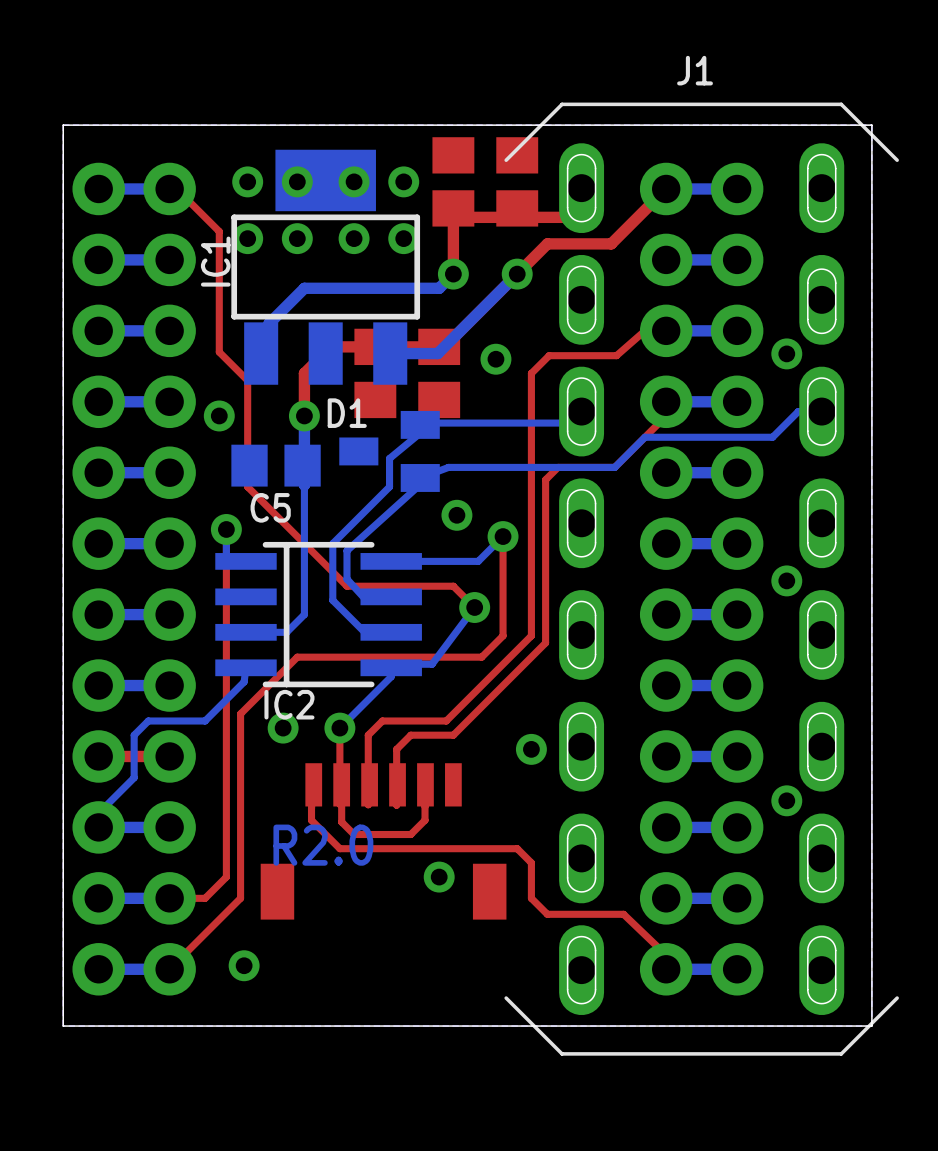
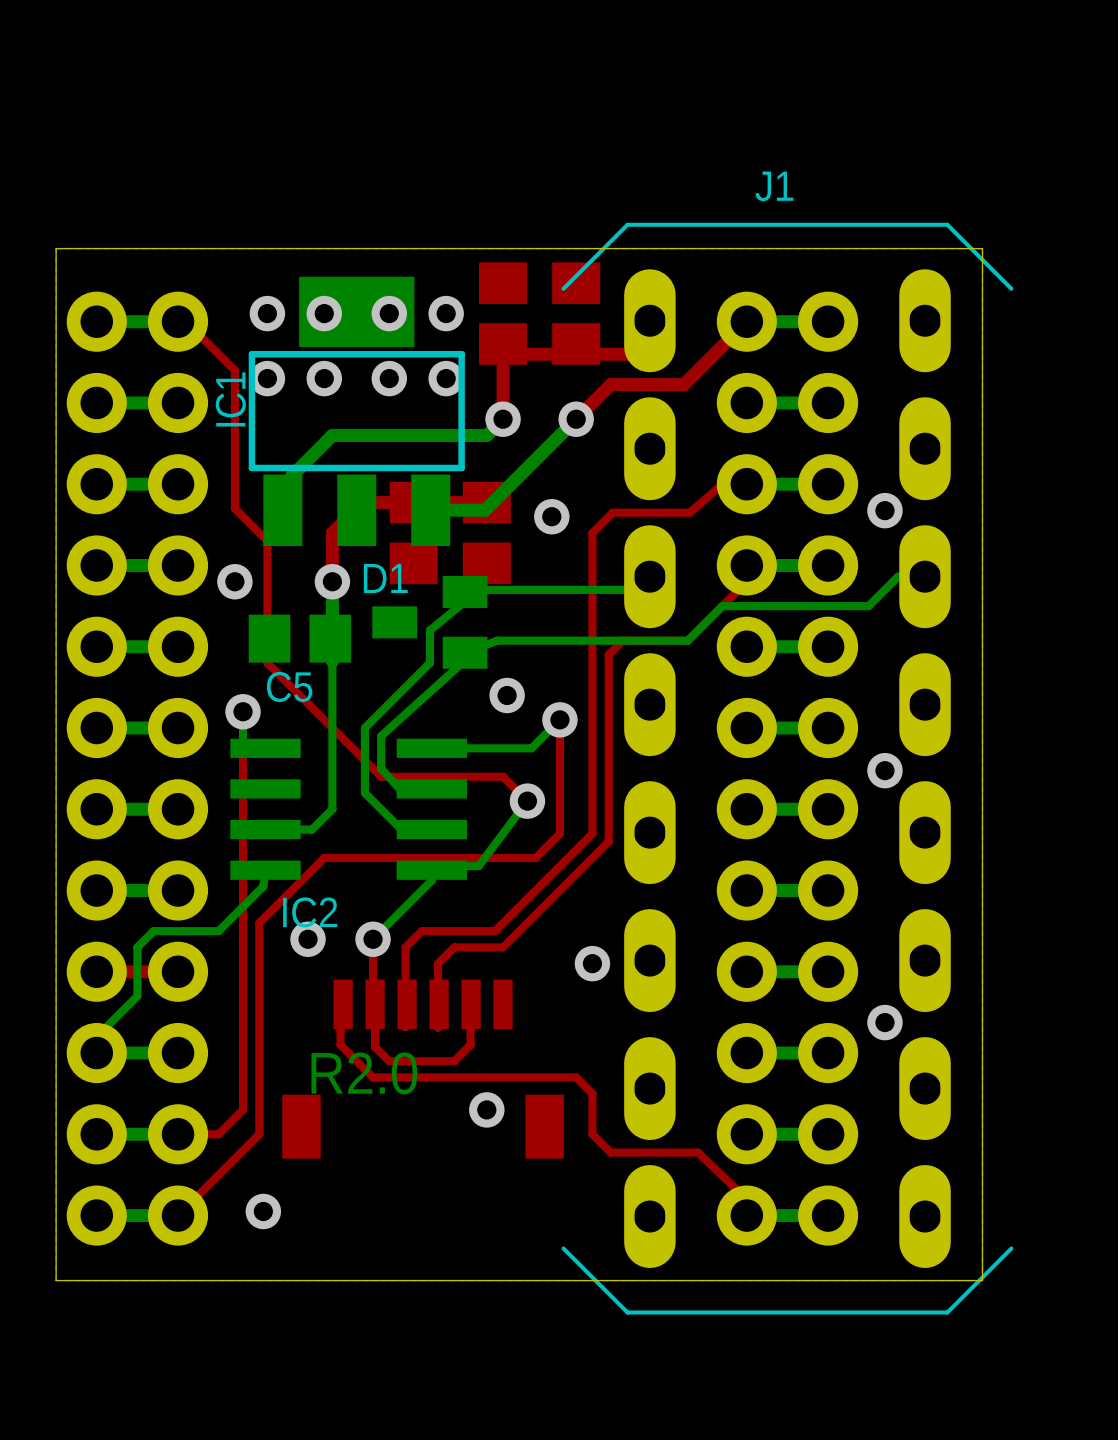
IC2 footprint: [215, 541, 422, 688] -> [230, 738, 468, 880]

